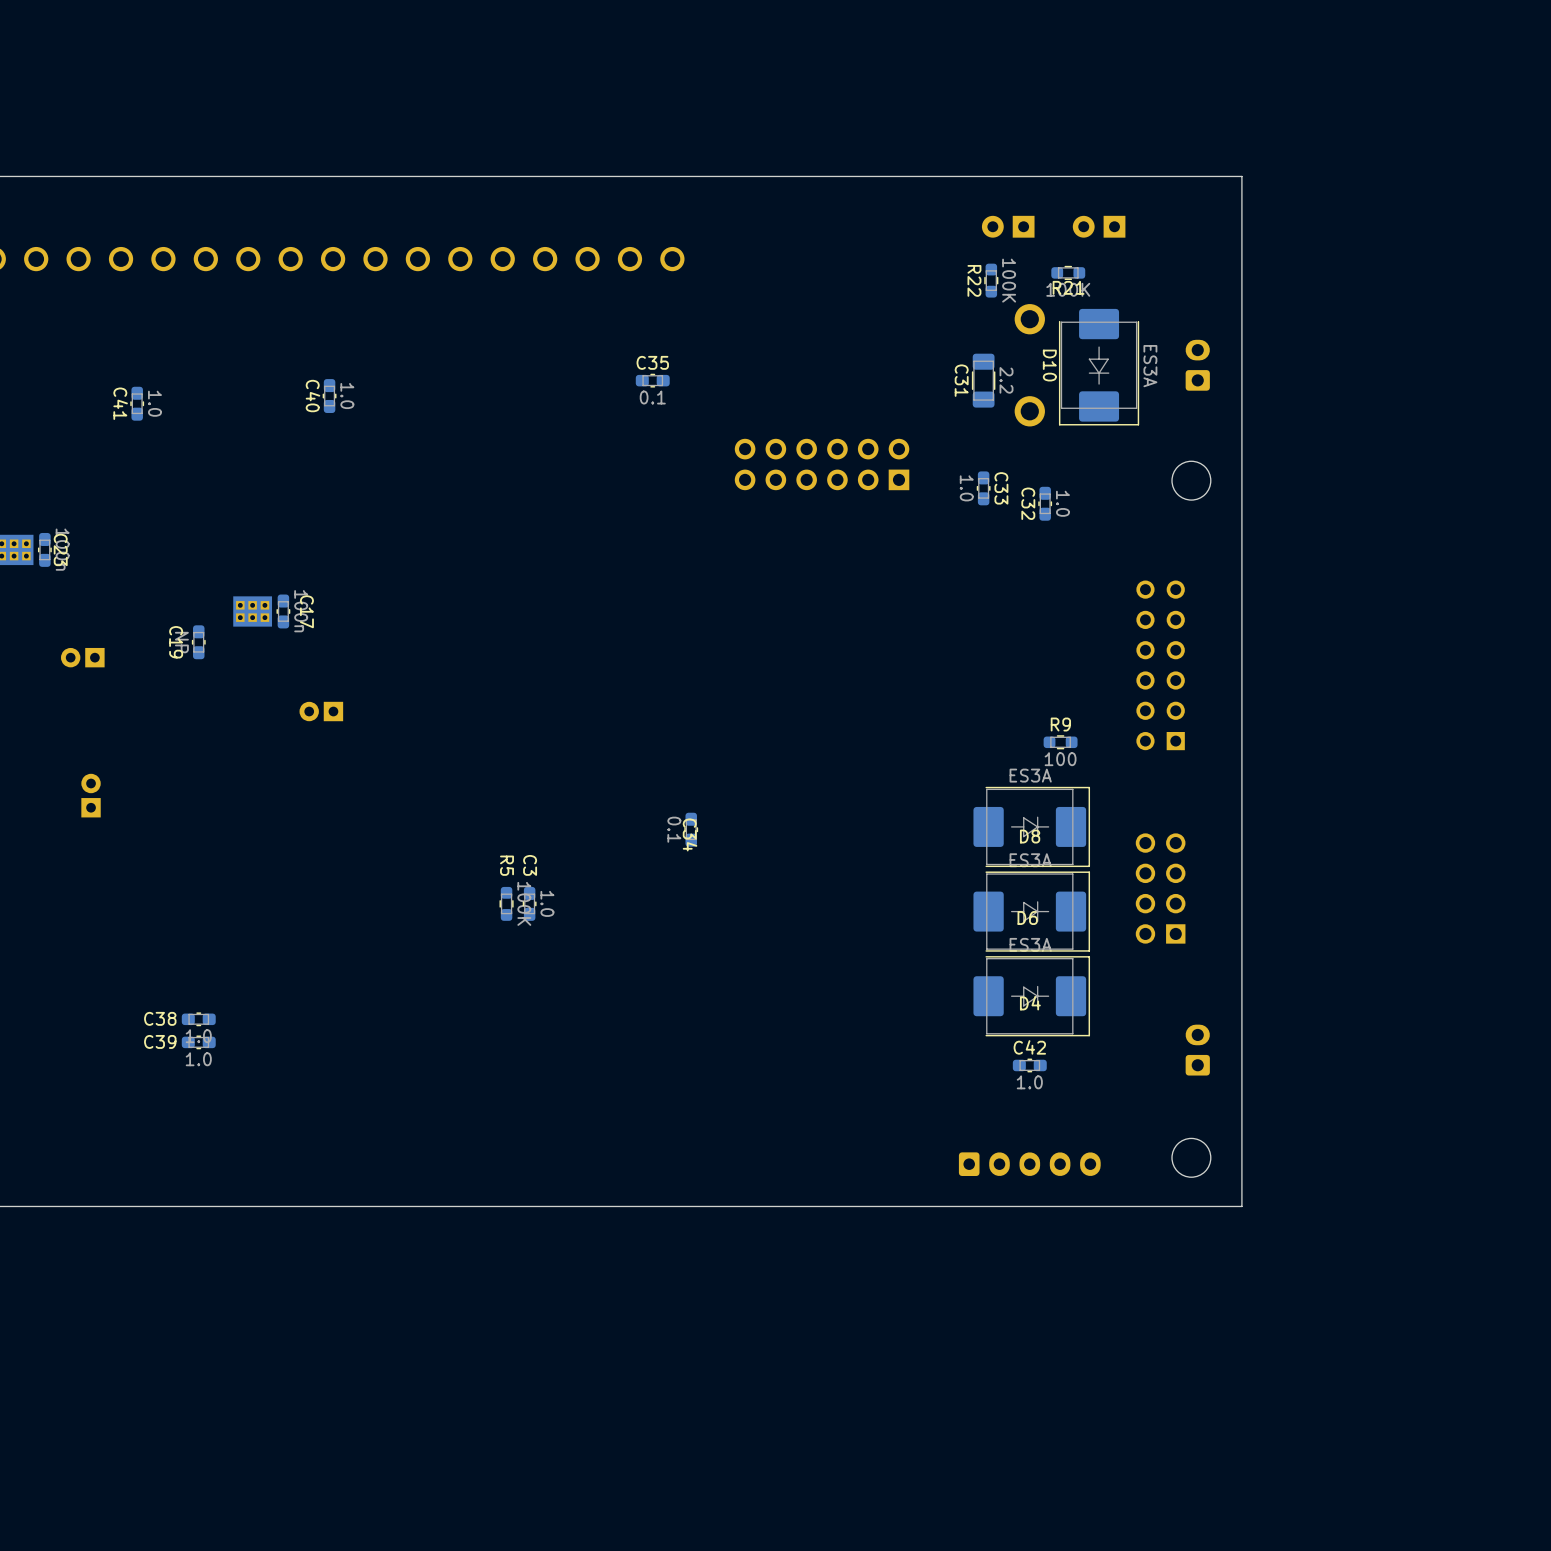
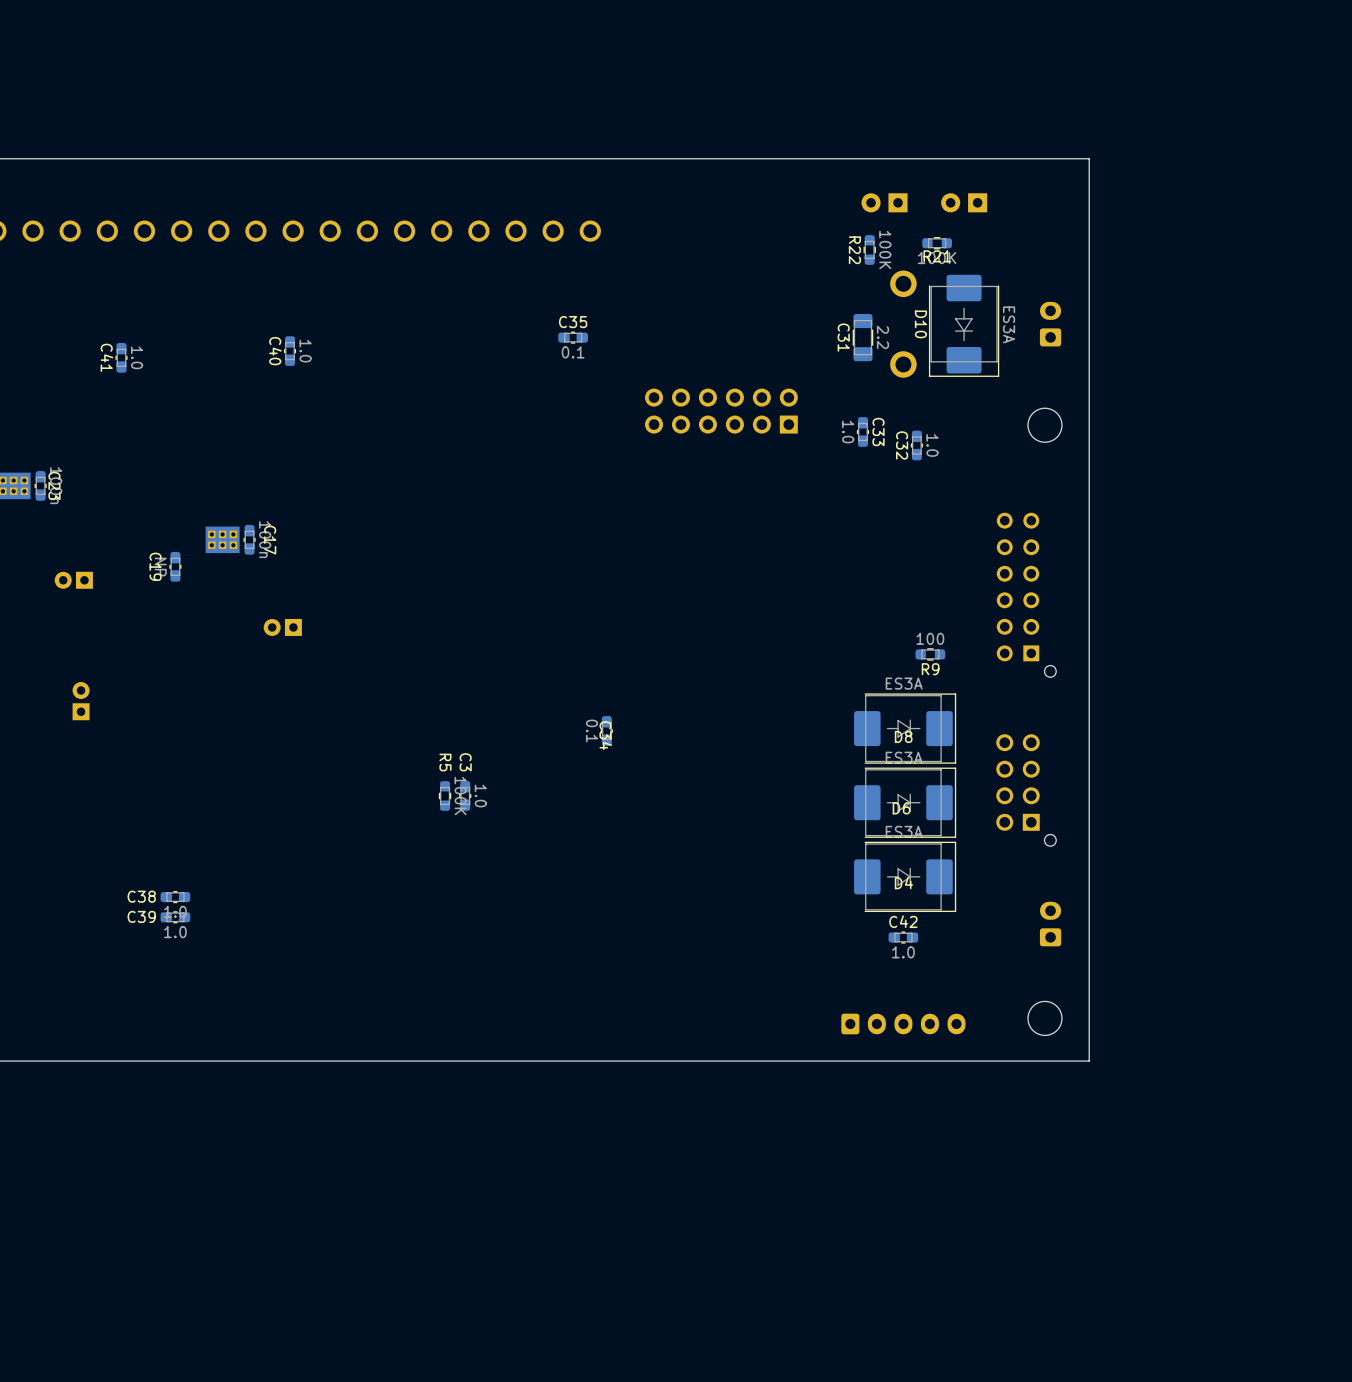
part: none -> (1026, 594)
R9 name position: R9 (1060, 724) -> R9 (930, 669)
R9 value position: 100 (1060, 759) -> 100 (930, 638)
part: none -> (1026, 790)

